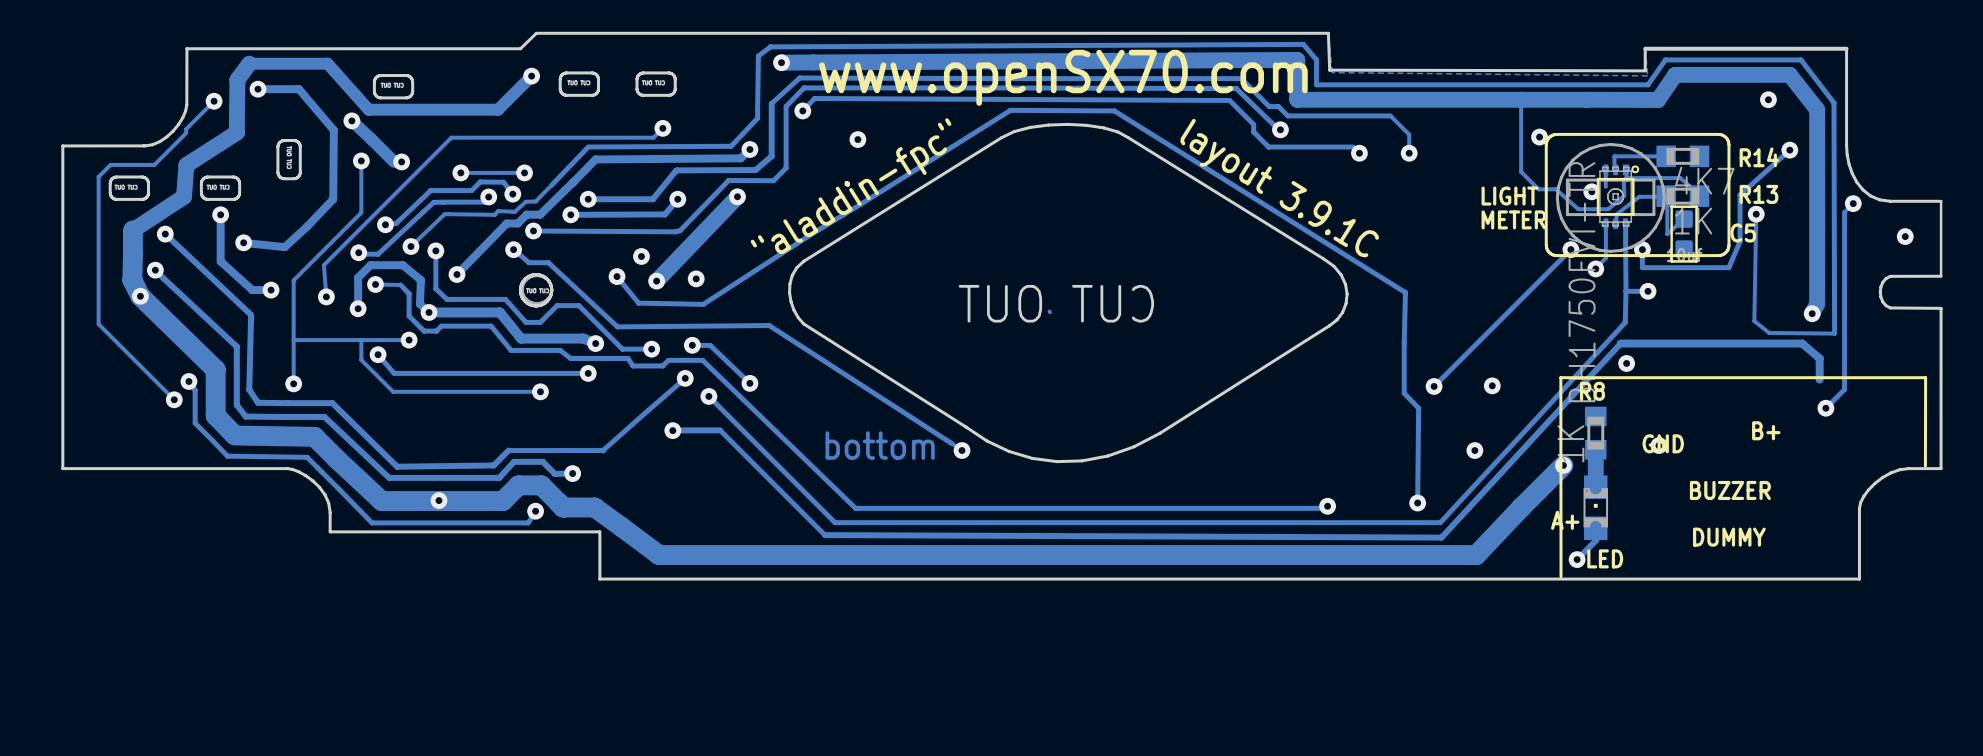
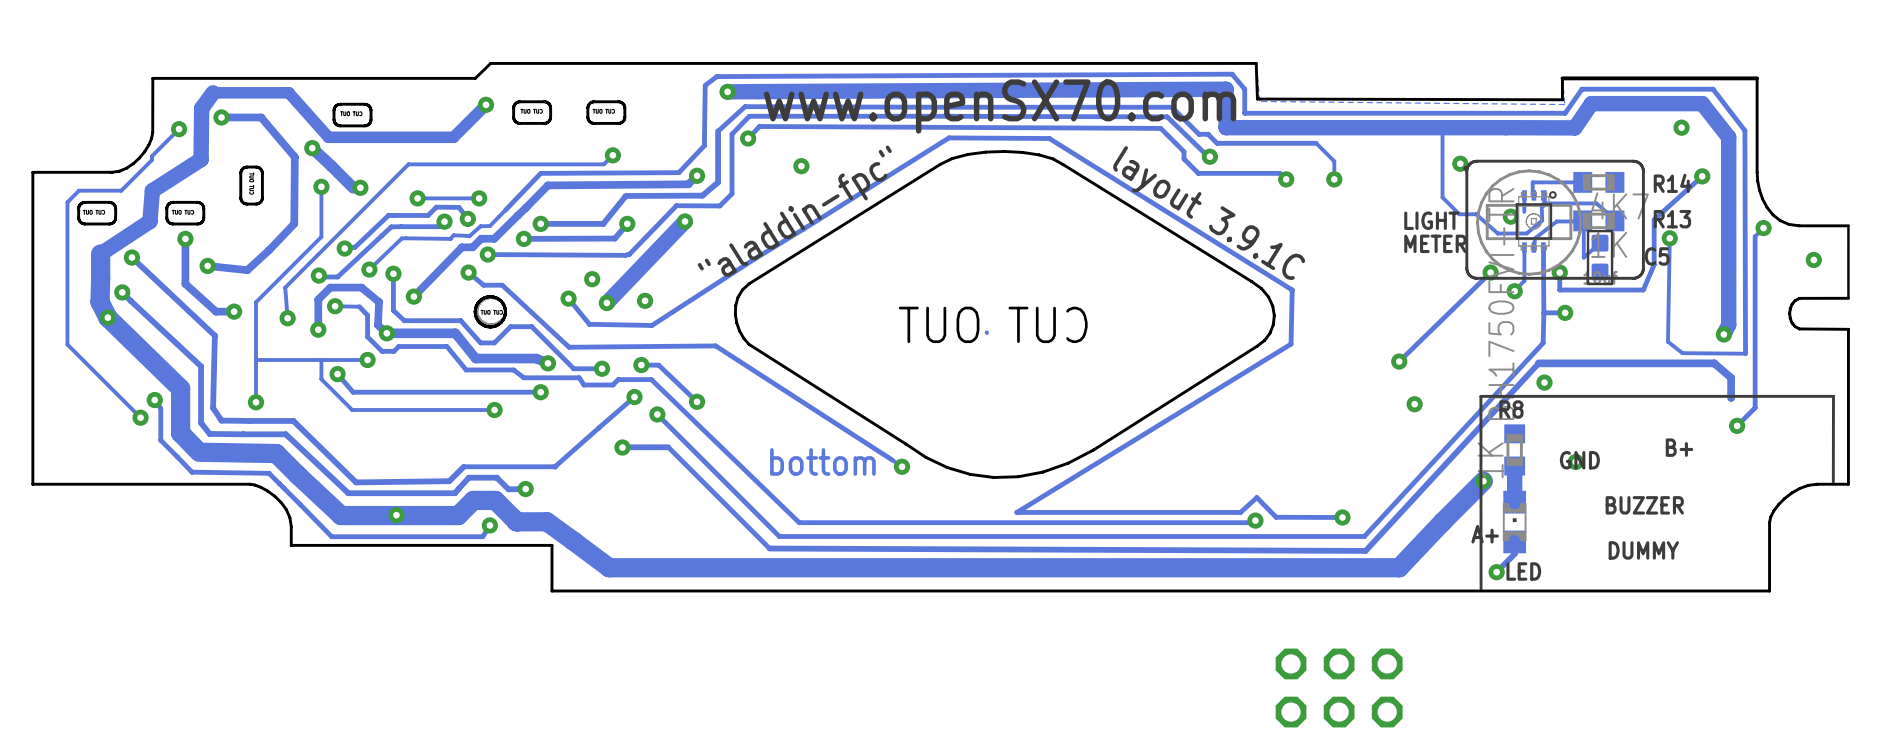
track: (1570, 249) (1434, 386) -> (1490, 272) (1399, 361)
track: (1365, 267) (1405, 292) (1404, 393) (1418, 408) (1417, 503) -> (1292, 290) (1291, 344) (1016, 512) (1240, 512) (1256, 497) (1276, 517) (1342, 517)
via: none -> (1399, 361)
via: (1434, 386) -> none
via: (1474, 450) -> none
part: none -> (1339, 688)

